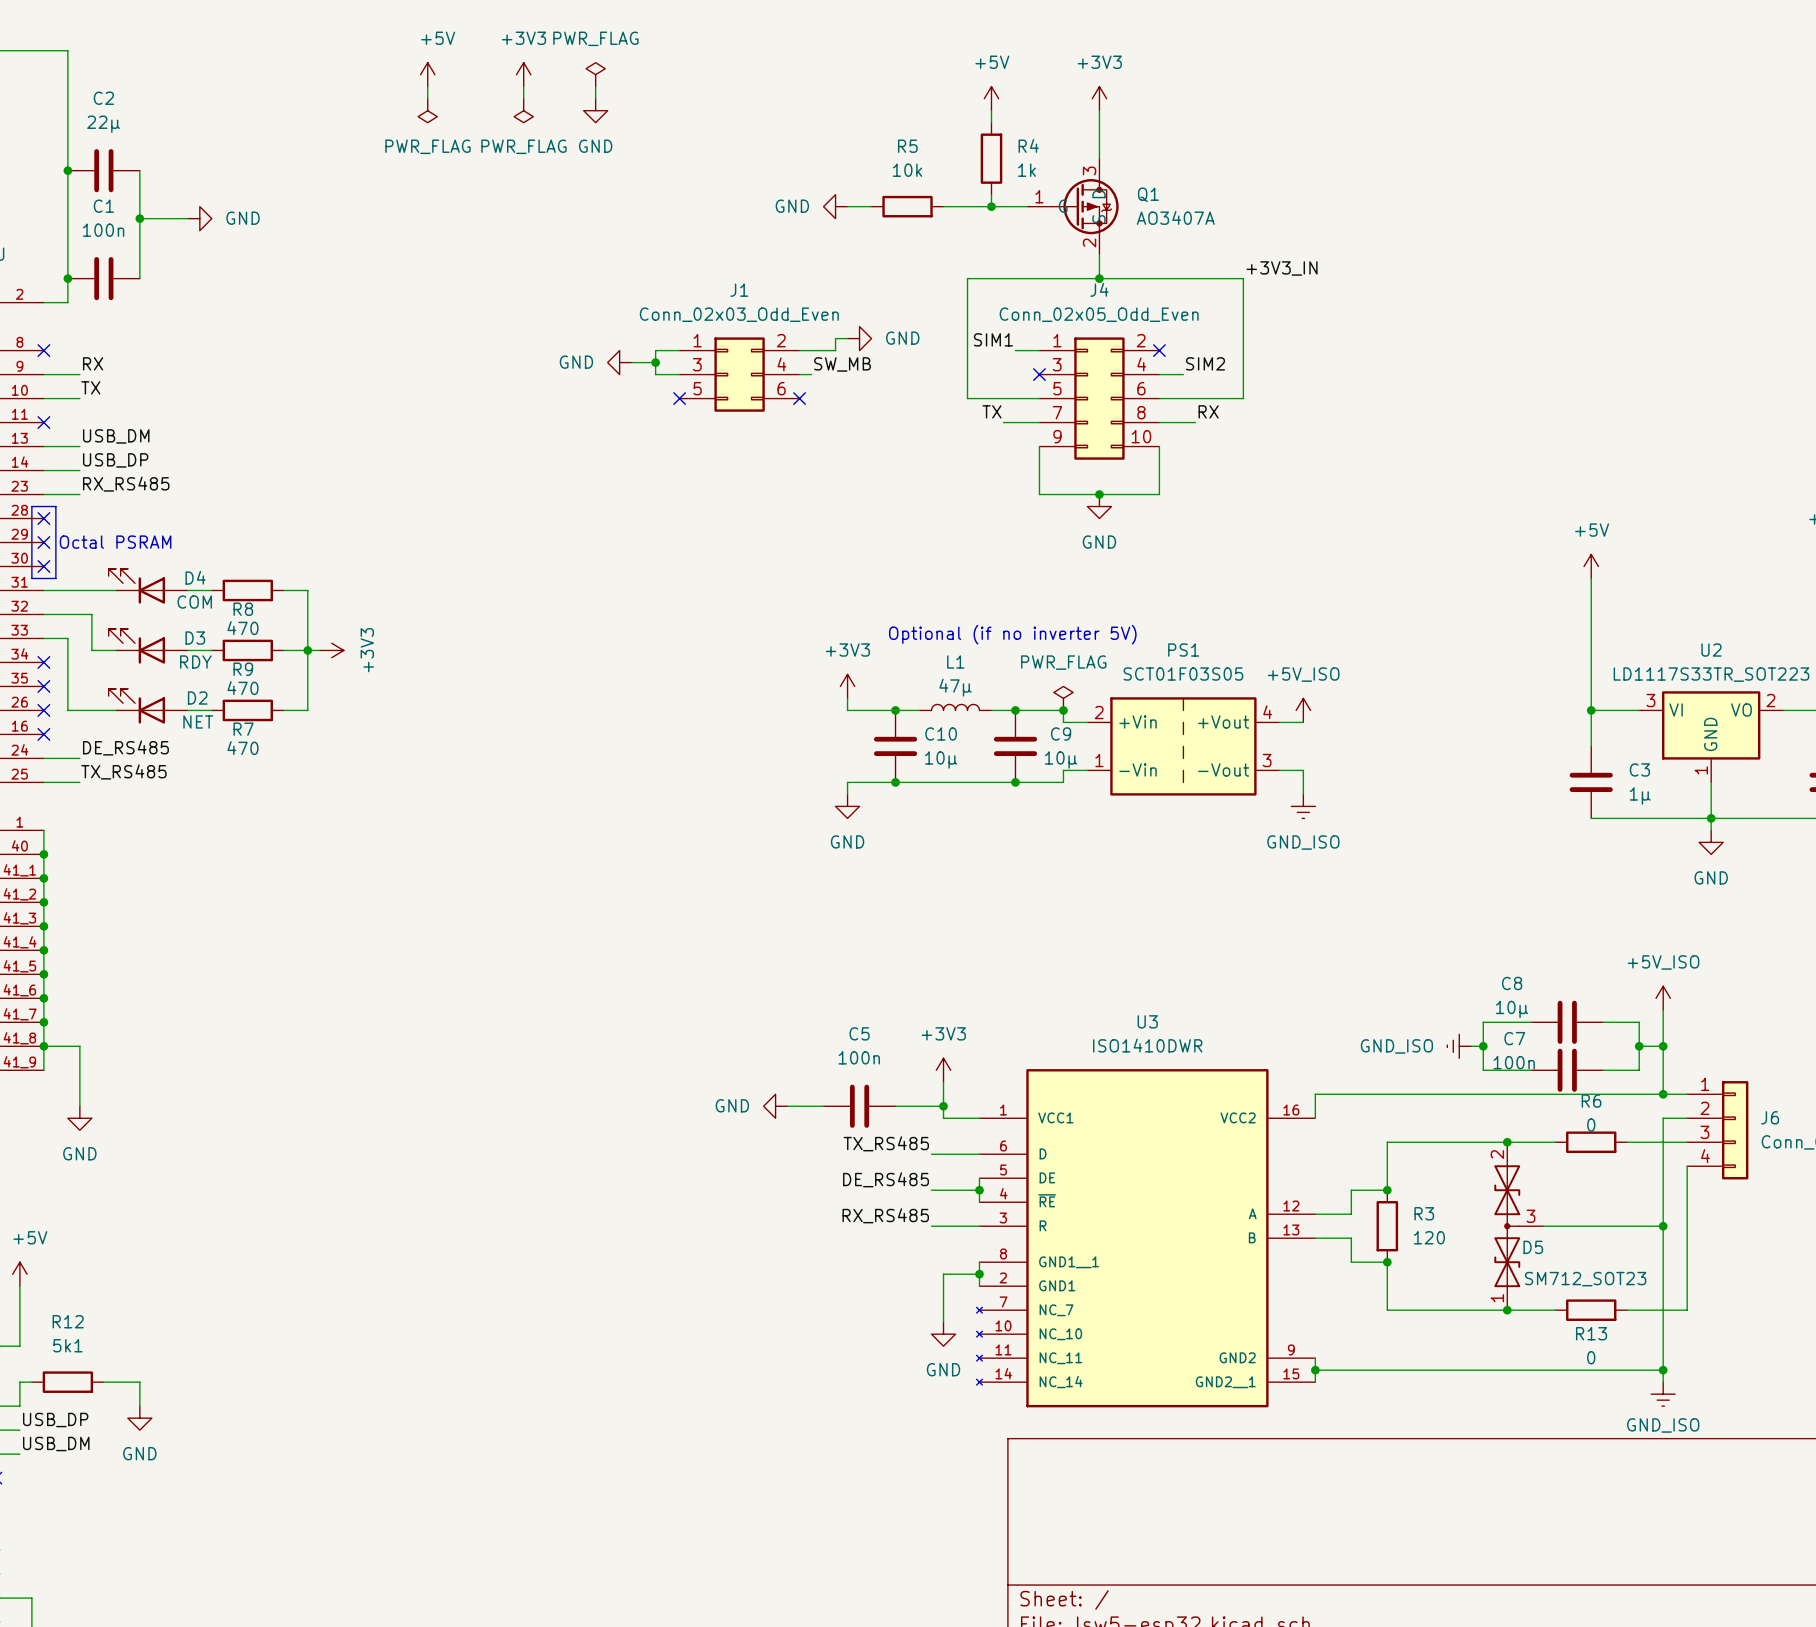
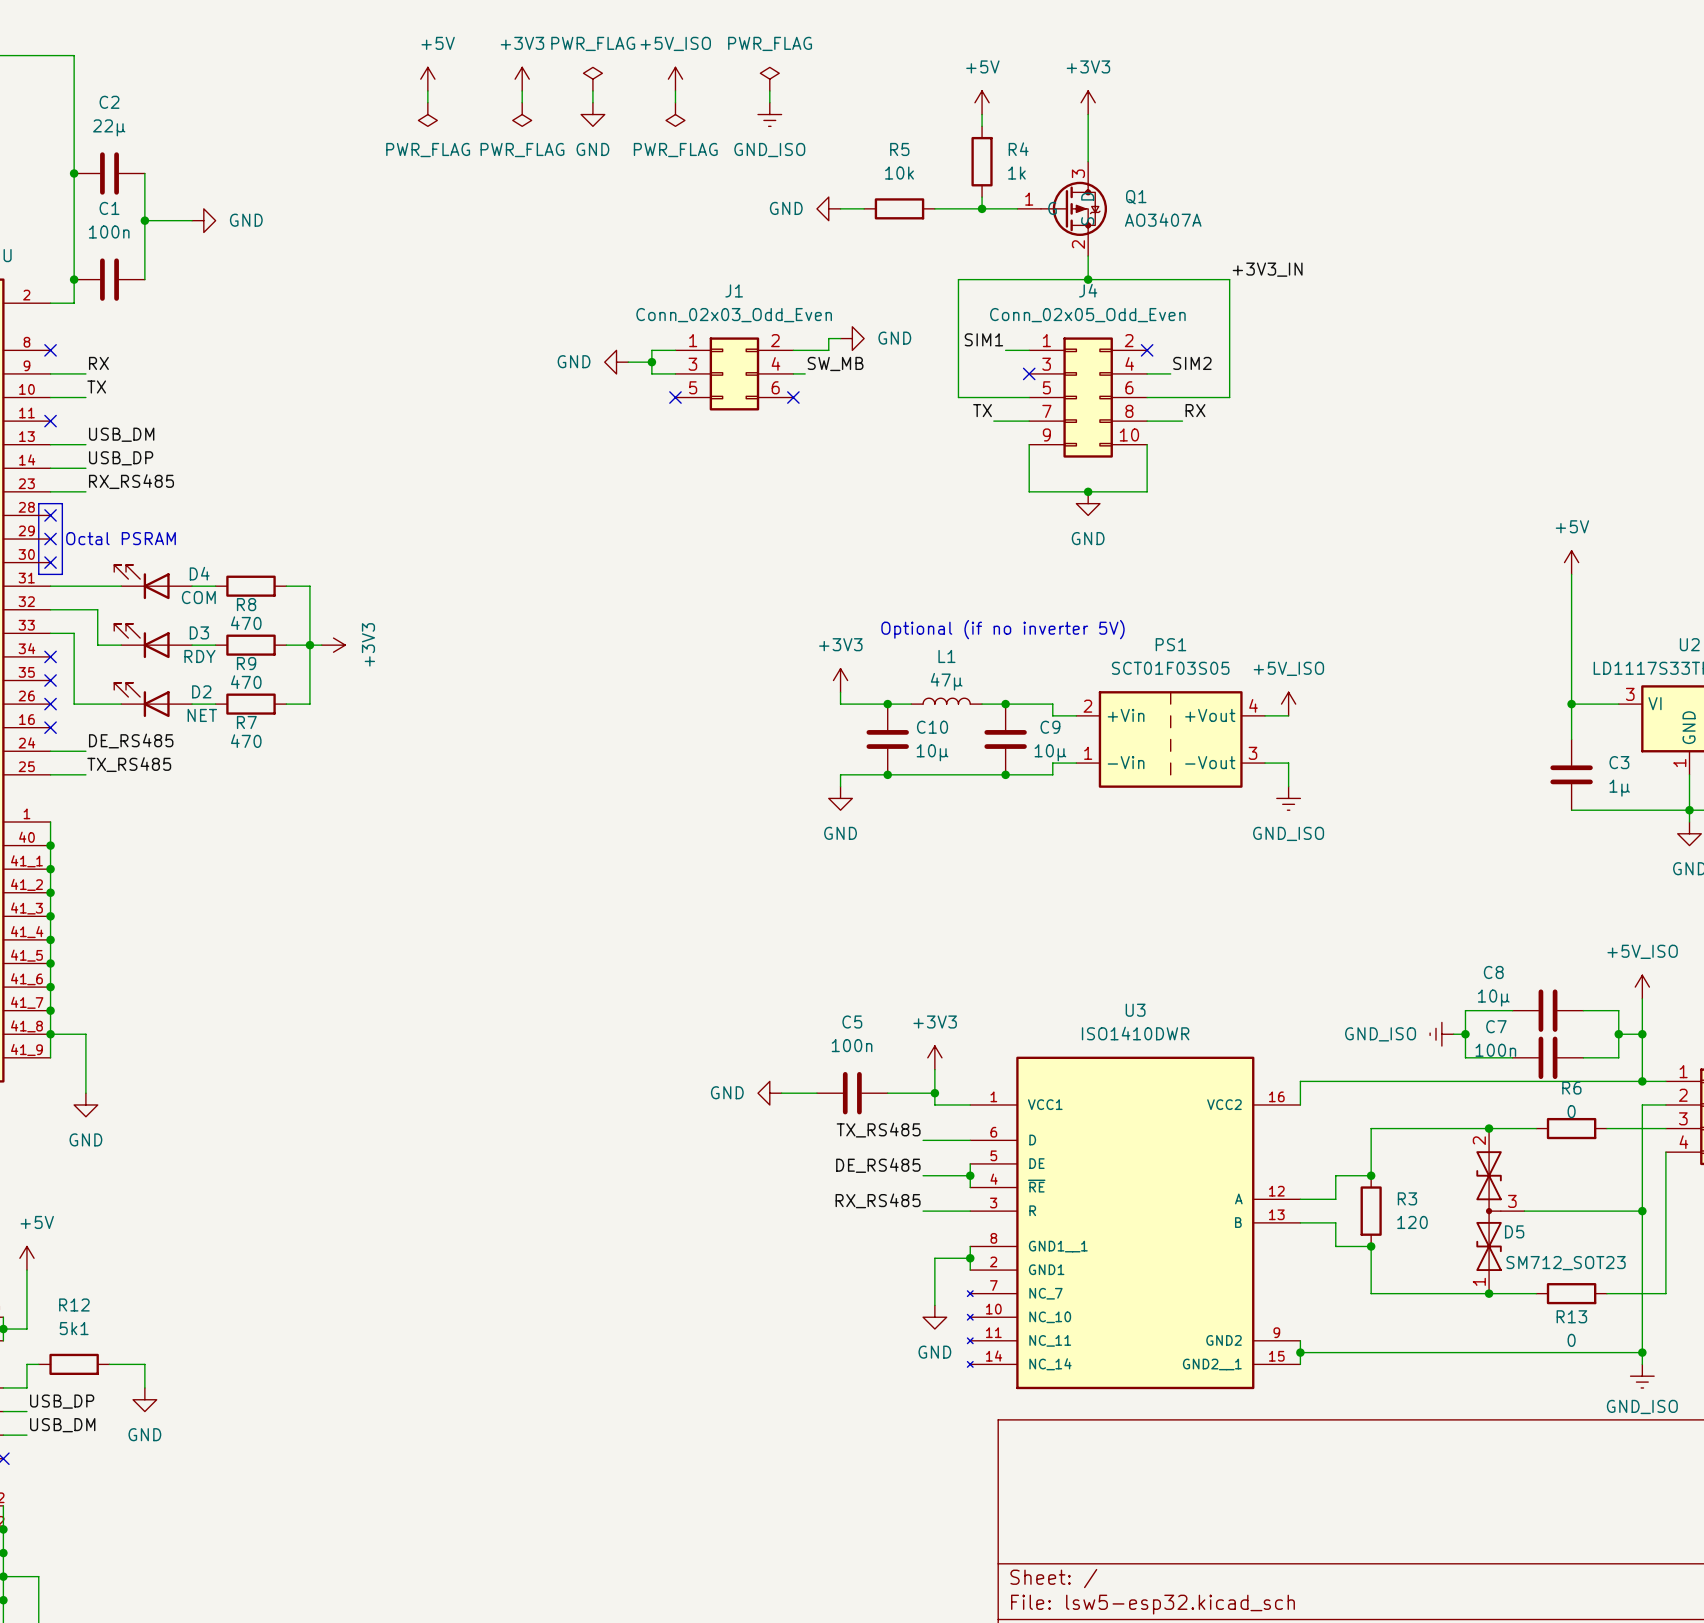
power symbol: none -> +5V_ISO (675, 79)
power symbol: none -> PWR_FLAG (769, 79)
wire: none -> (675, 90) (675, 102)
wire: none -> (769, 90) (769, 102)
power symbol: none -> PWR_FLAG (675, 114)
power symbol: none -> GND_ISO (769, 114)
power symbol: PWR_FLAG (1063, 698) -> none
junction: (1063, 710) -> none

